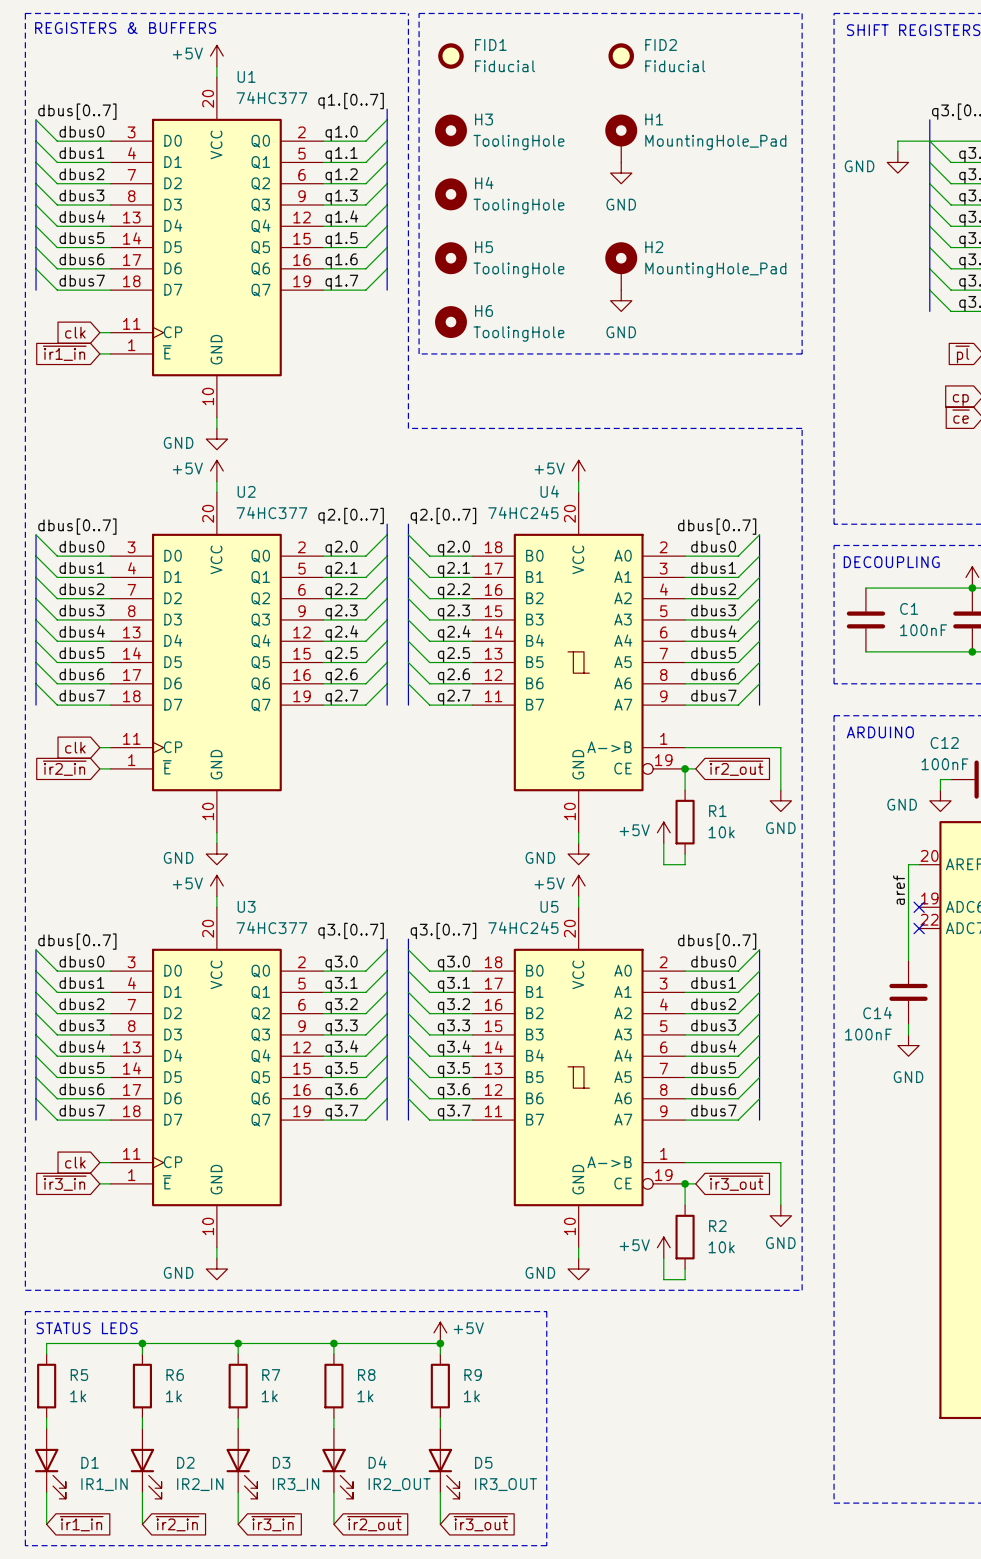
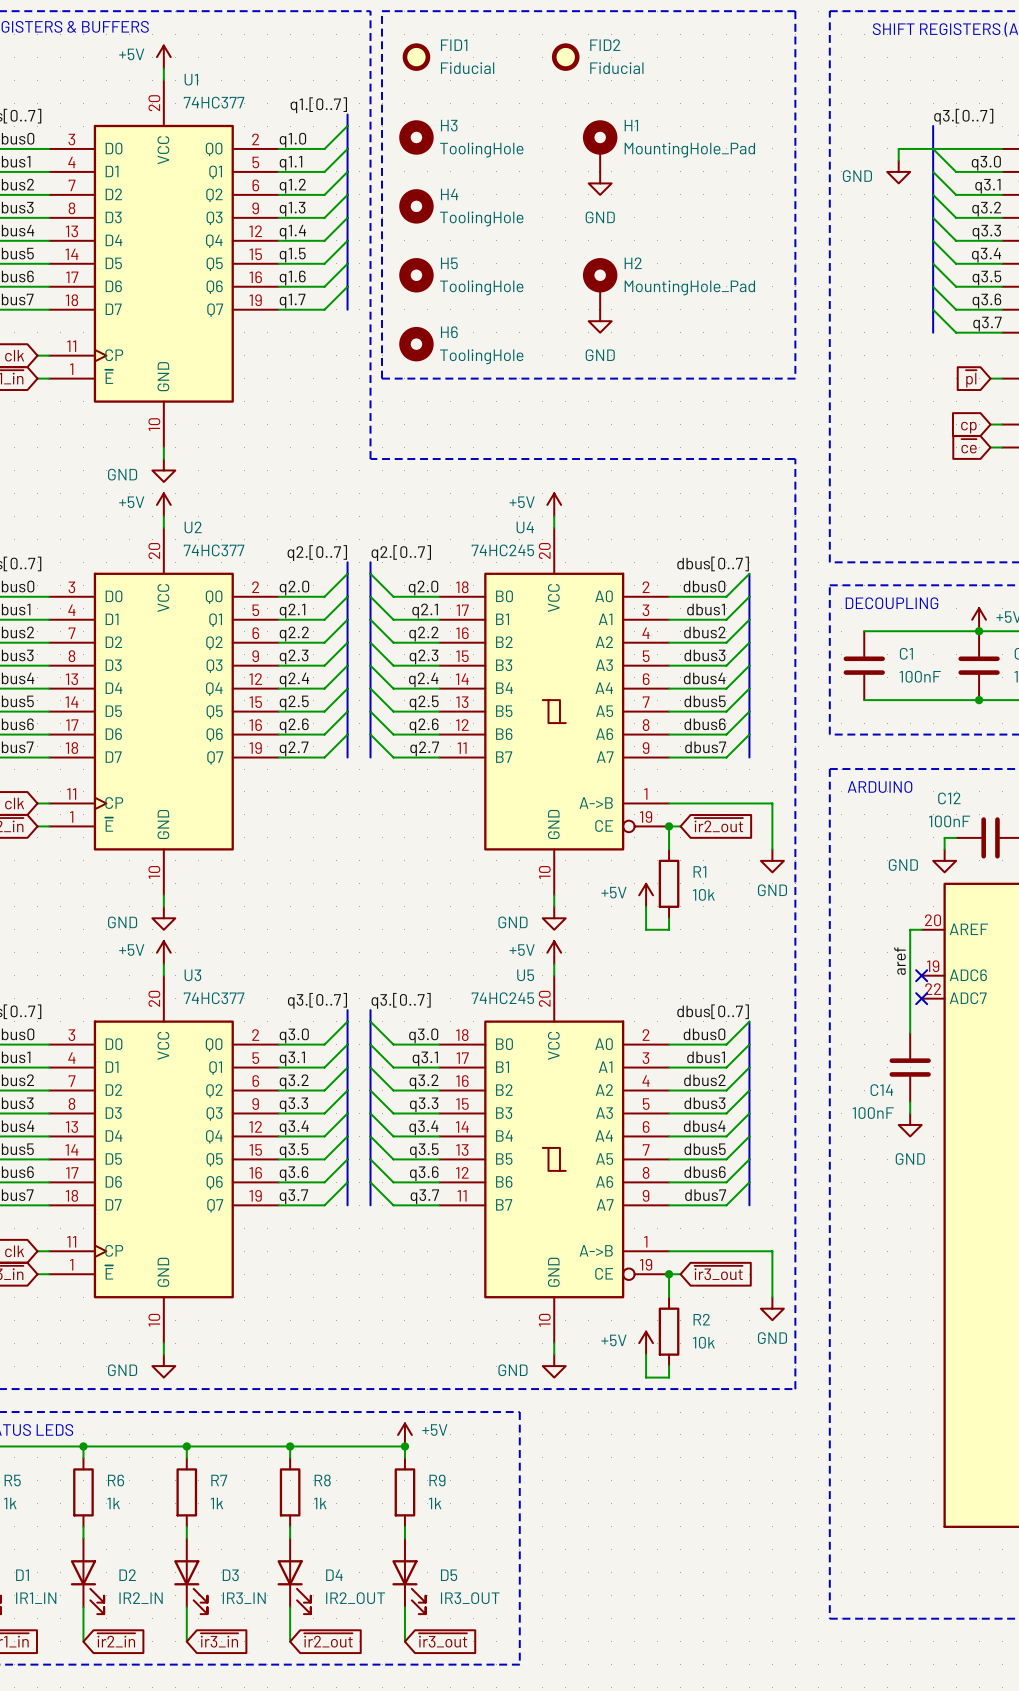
FID2 position: (621, 56) -> (565, 57)

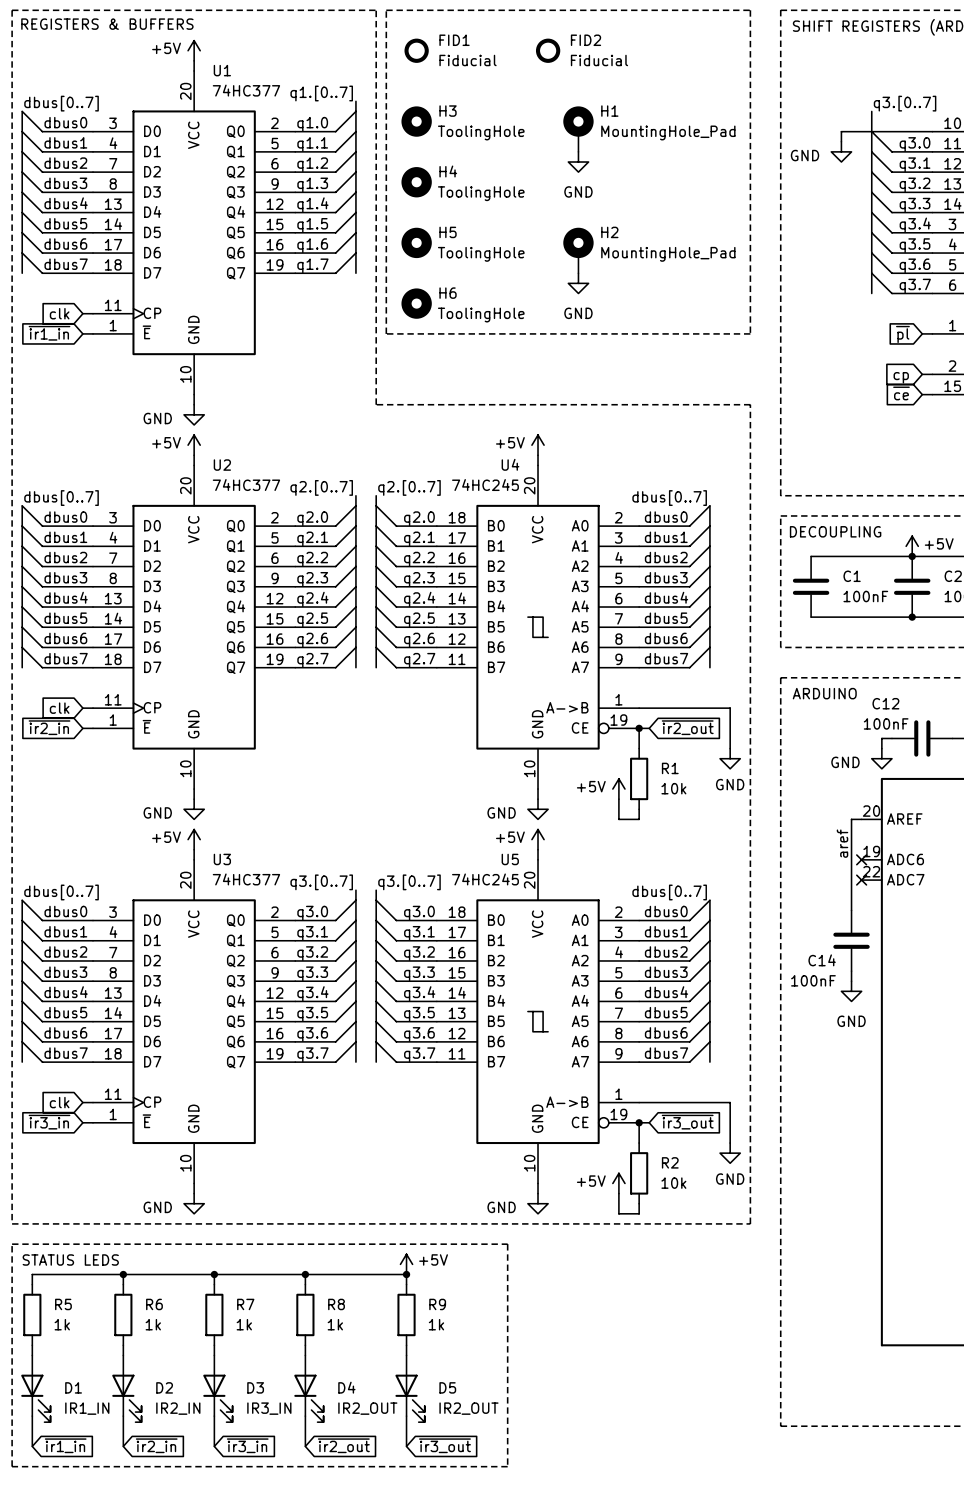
D5 value: IR3_OUT (470, 1598) -> IR2_OUT (468, 1408)

